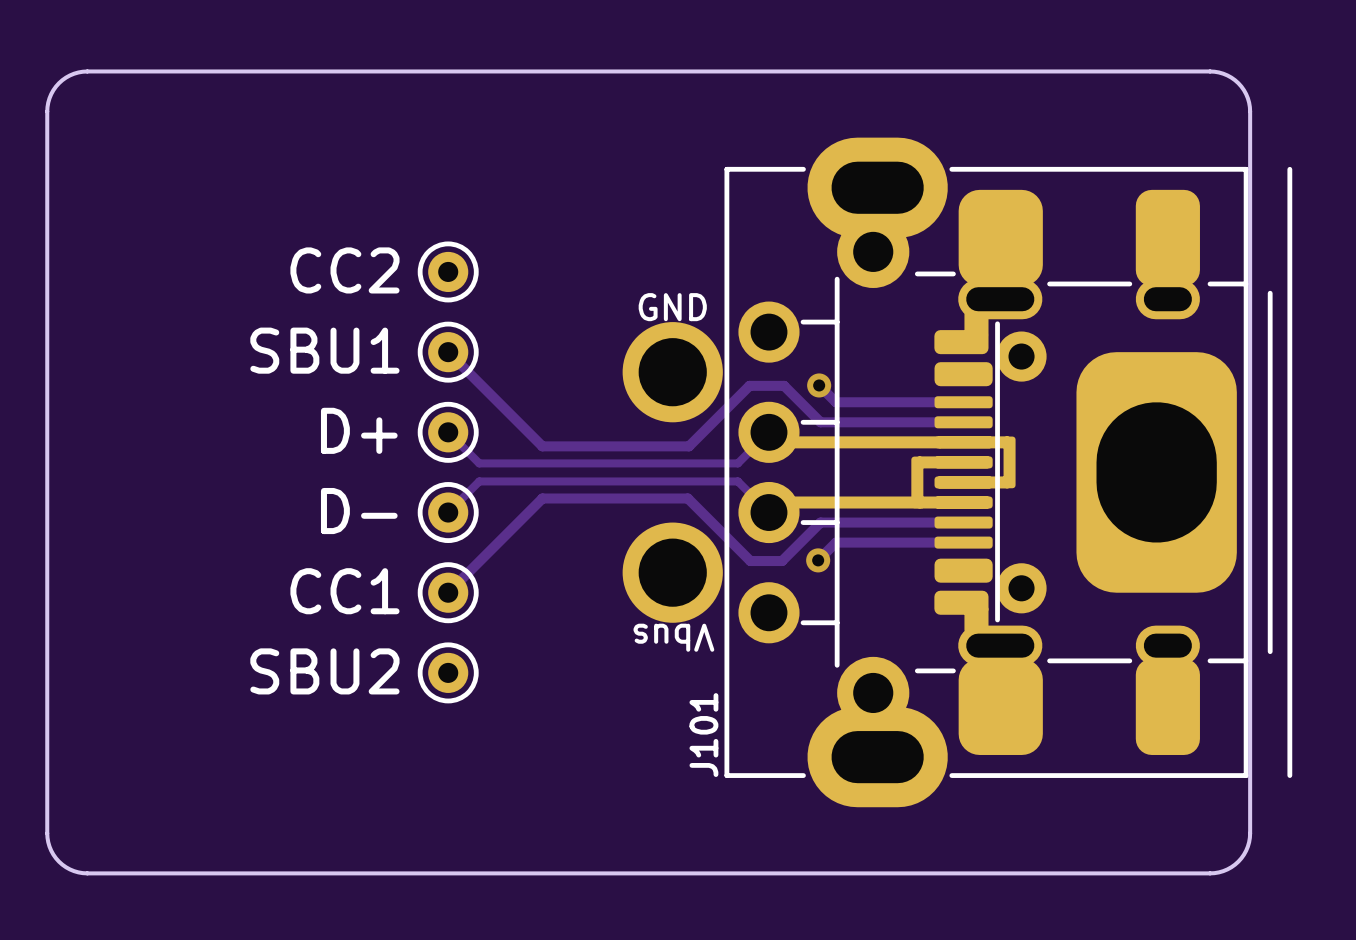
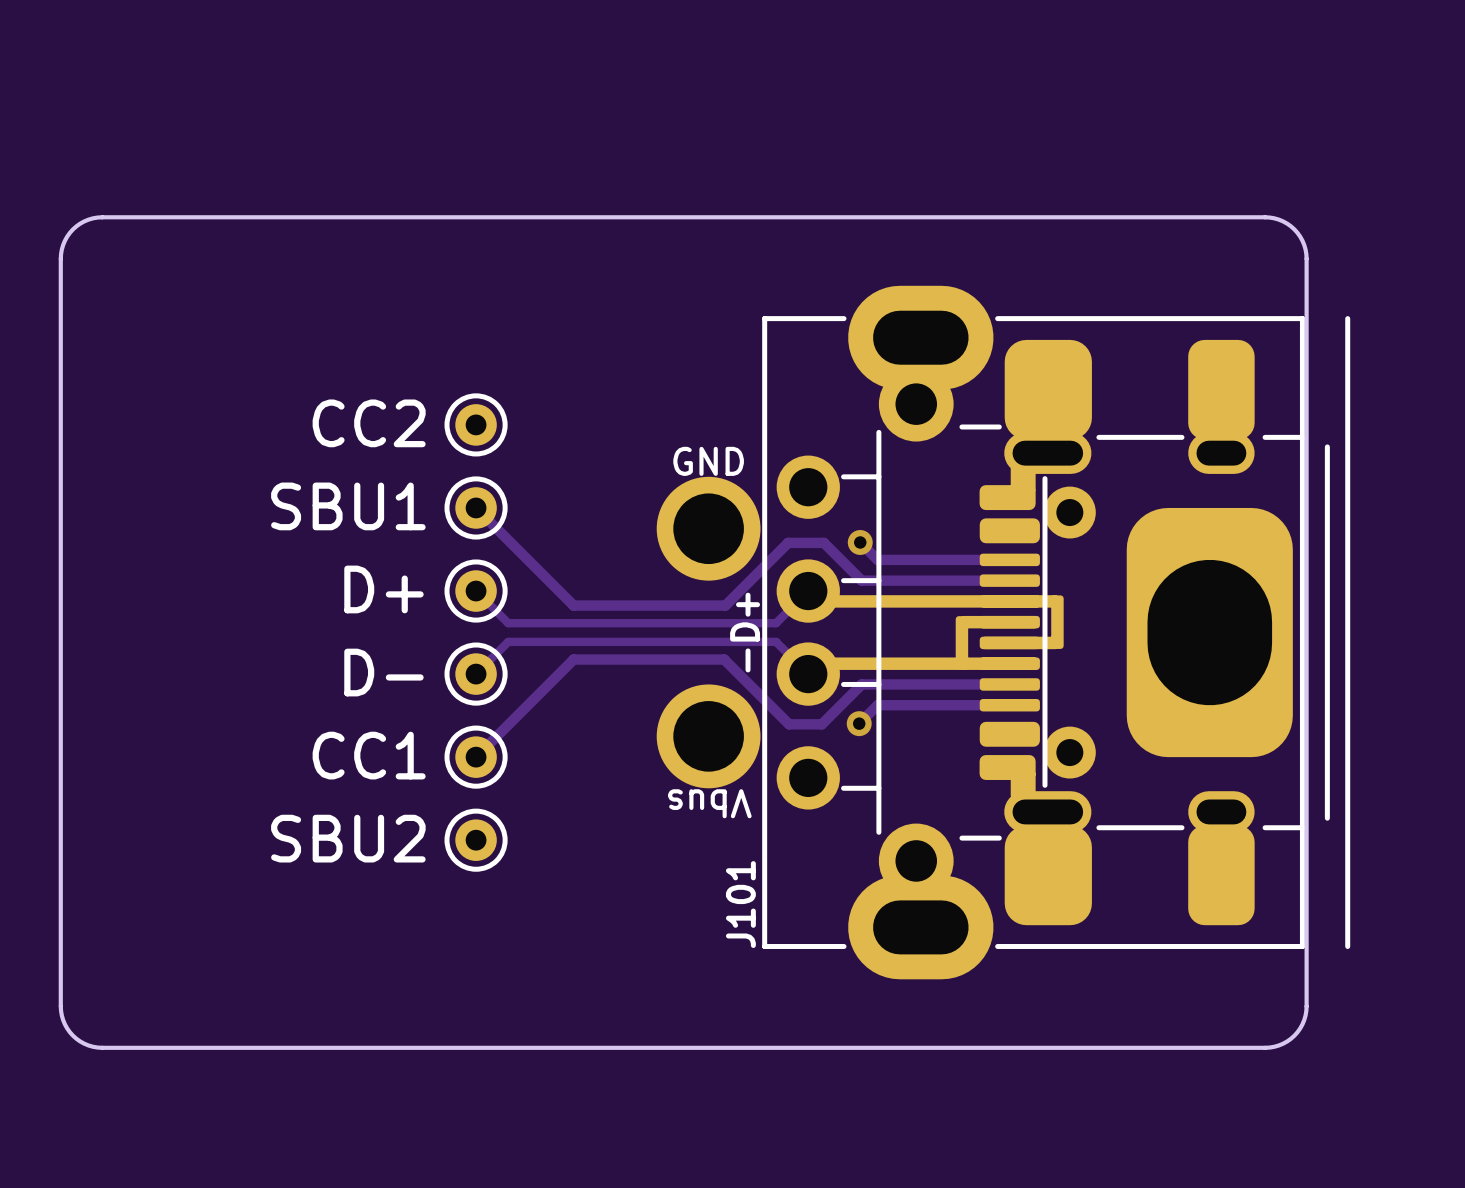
J101 text: none -> -D+ (745, 632)

